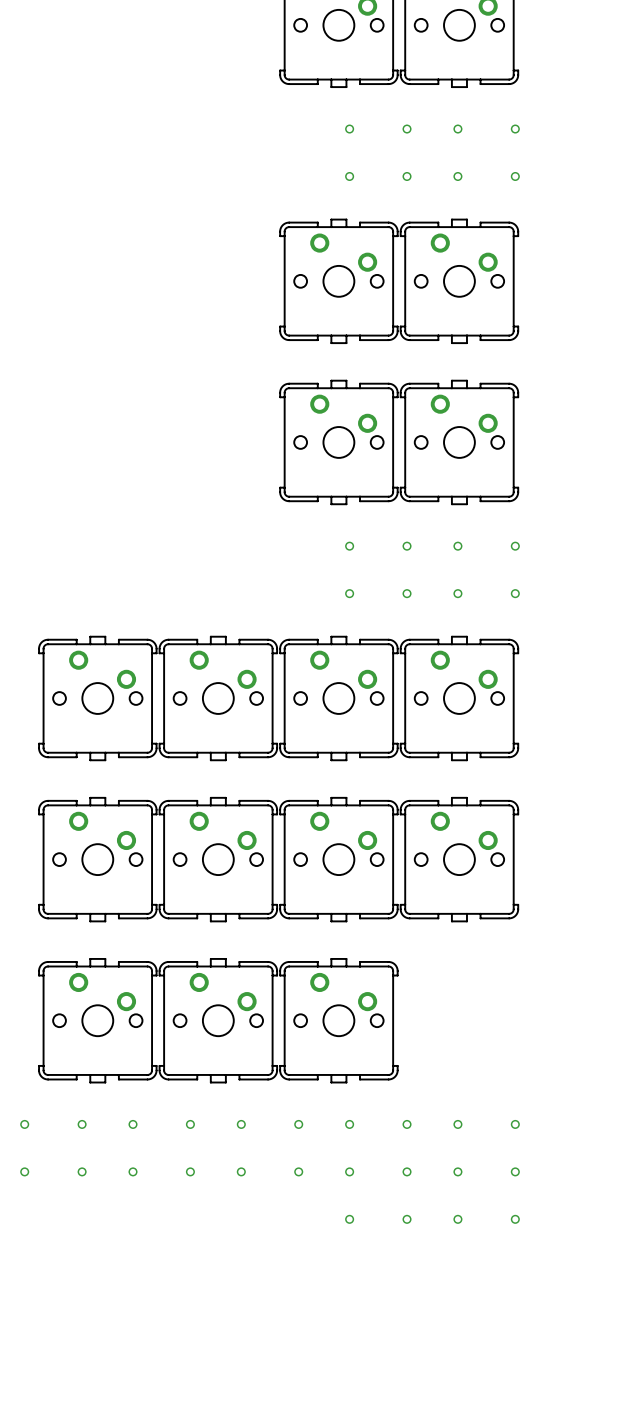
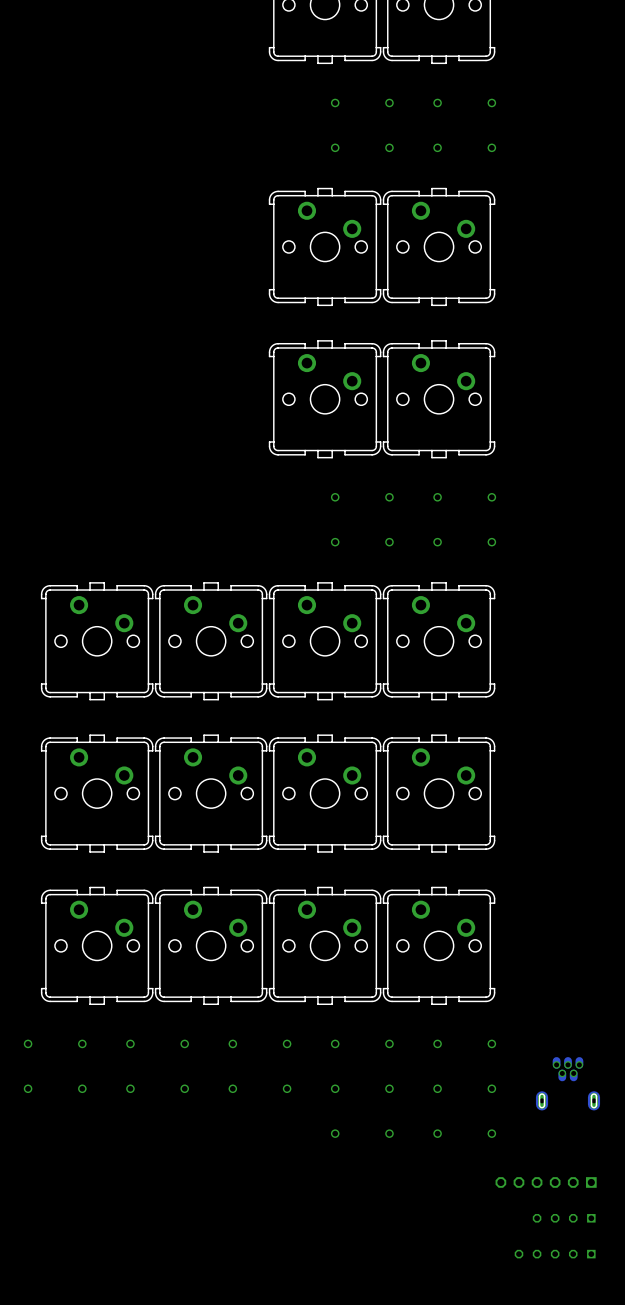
part: none -> (439, 945)
part: none -> (568, 1083)
part: none -> (546, 1182)
part: none -> (564, 1218)
part: none -> (555, 1254)

